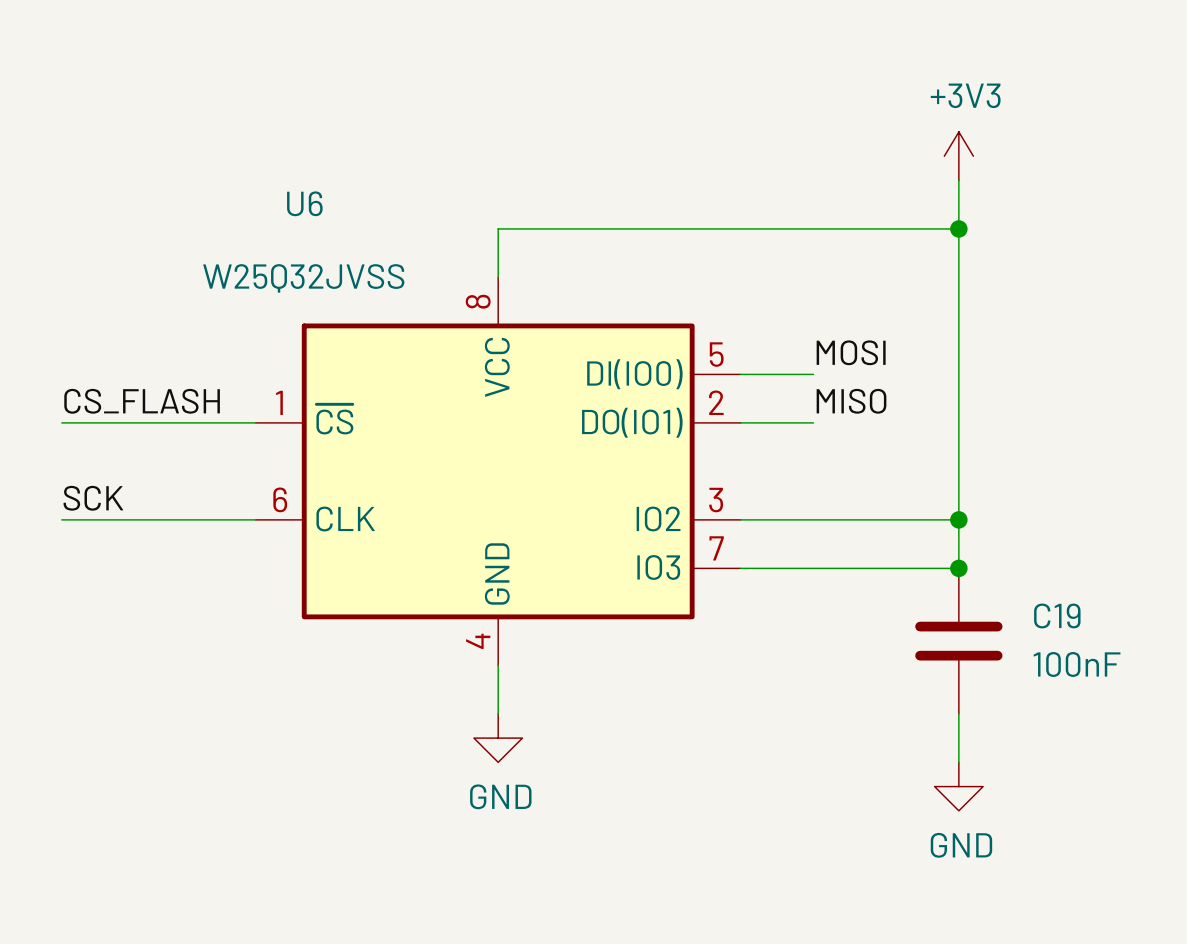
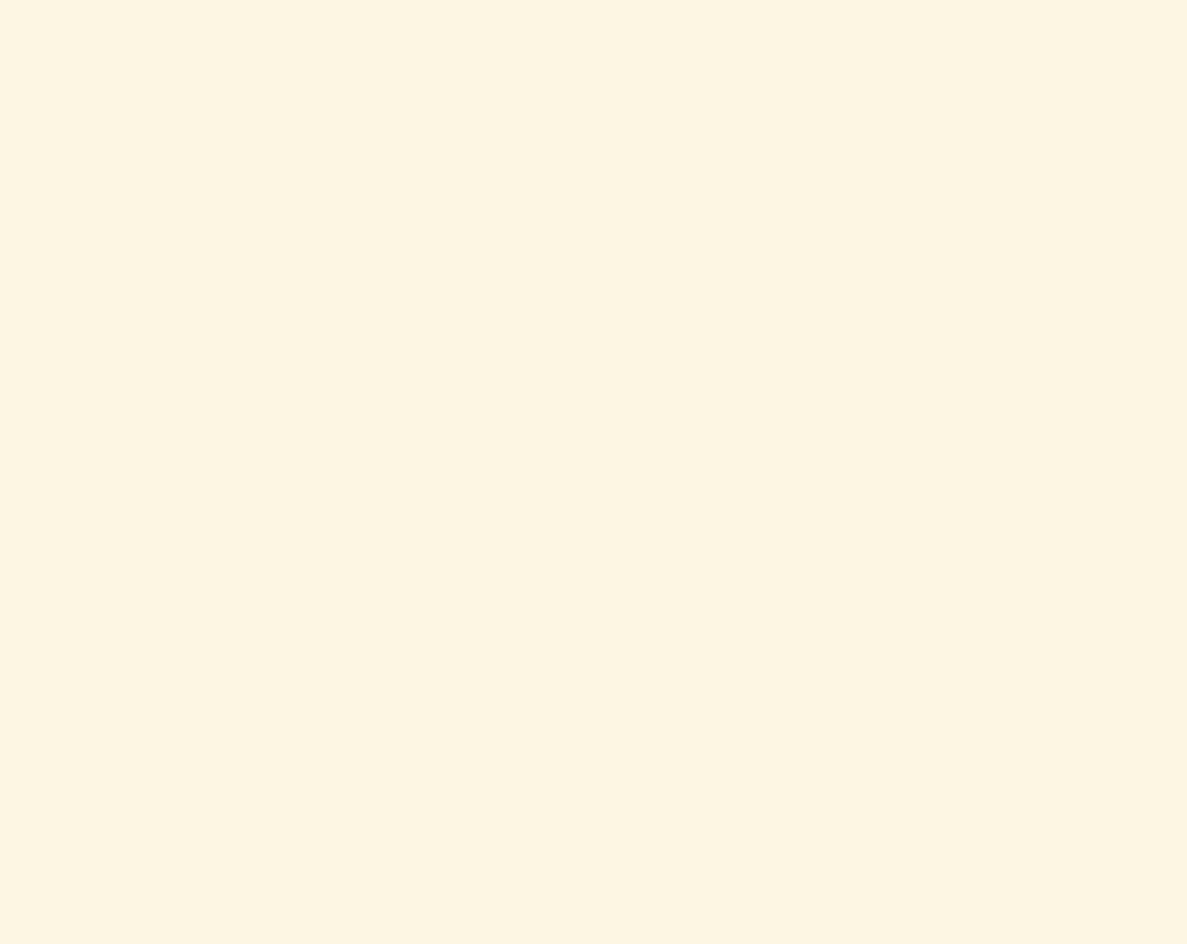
power symbol: +3V3 (958, 156) -> none
wire: (958, 180) (958, 568) (740, 568) -> none
wire: (958, 228) (498, 228) (498, 277) -> none
junction: (958, 228) -> none
label: MOSI (851, 352) -> none
wire: (740, 374) (813, 374) -> none
label: CS_FLASH (142, 401) -> none
label: MISO (851, 401) -> none
wire: (61, 422) (255, 422) -> none
wire: (740, 422) (813, 422) -> none
U6: W25Q32JVSS (498, 471) -> none
label: SCK (93, 498) -> none
wire: (61, 519) (255, 519) -> none
wire: (740, 519) (958, 519) -> none
junction: (958, 519) -> none
junction: (958, 568) -> none
C19: 100nF (958, 641) -> none
wire: (498, 665) (498, 713) -> none
wire: (958, 713) (958, 762) -> none
power symbol: GND (498, 738) -> none
power symbol: GND (958, 786) -> none

